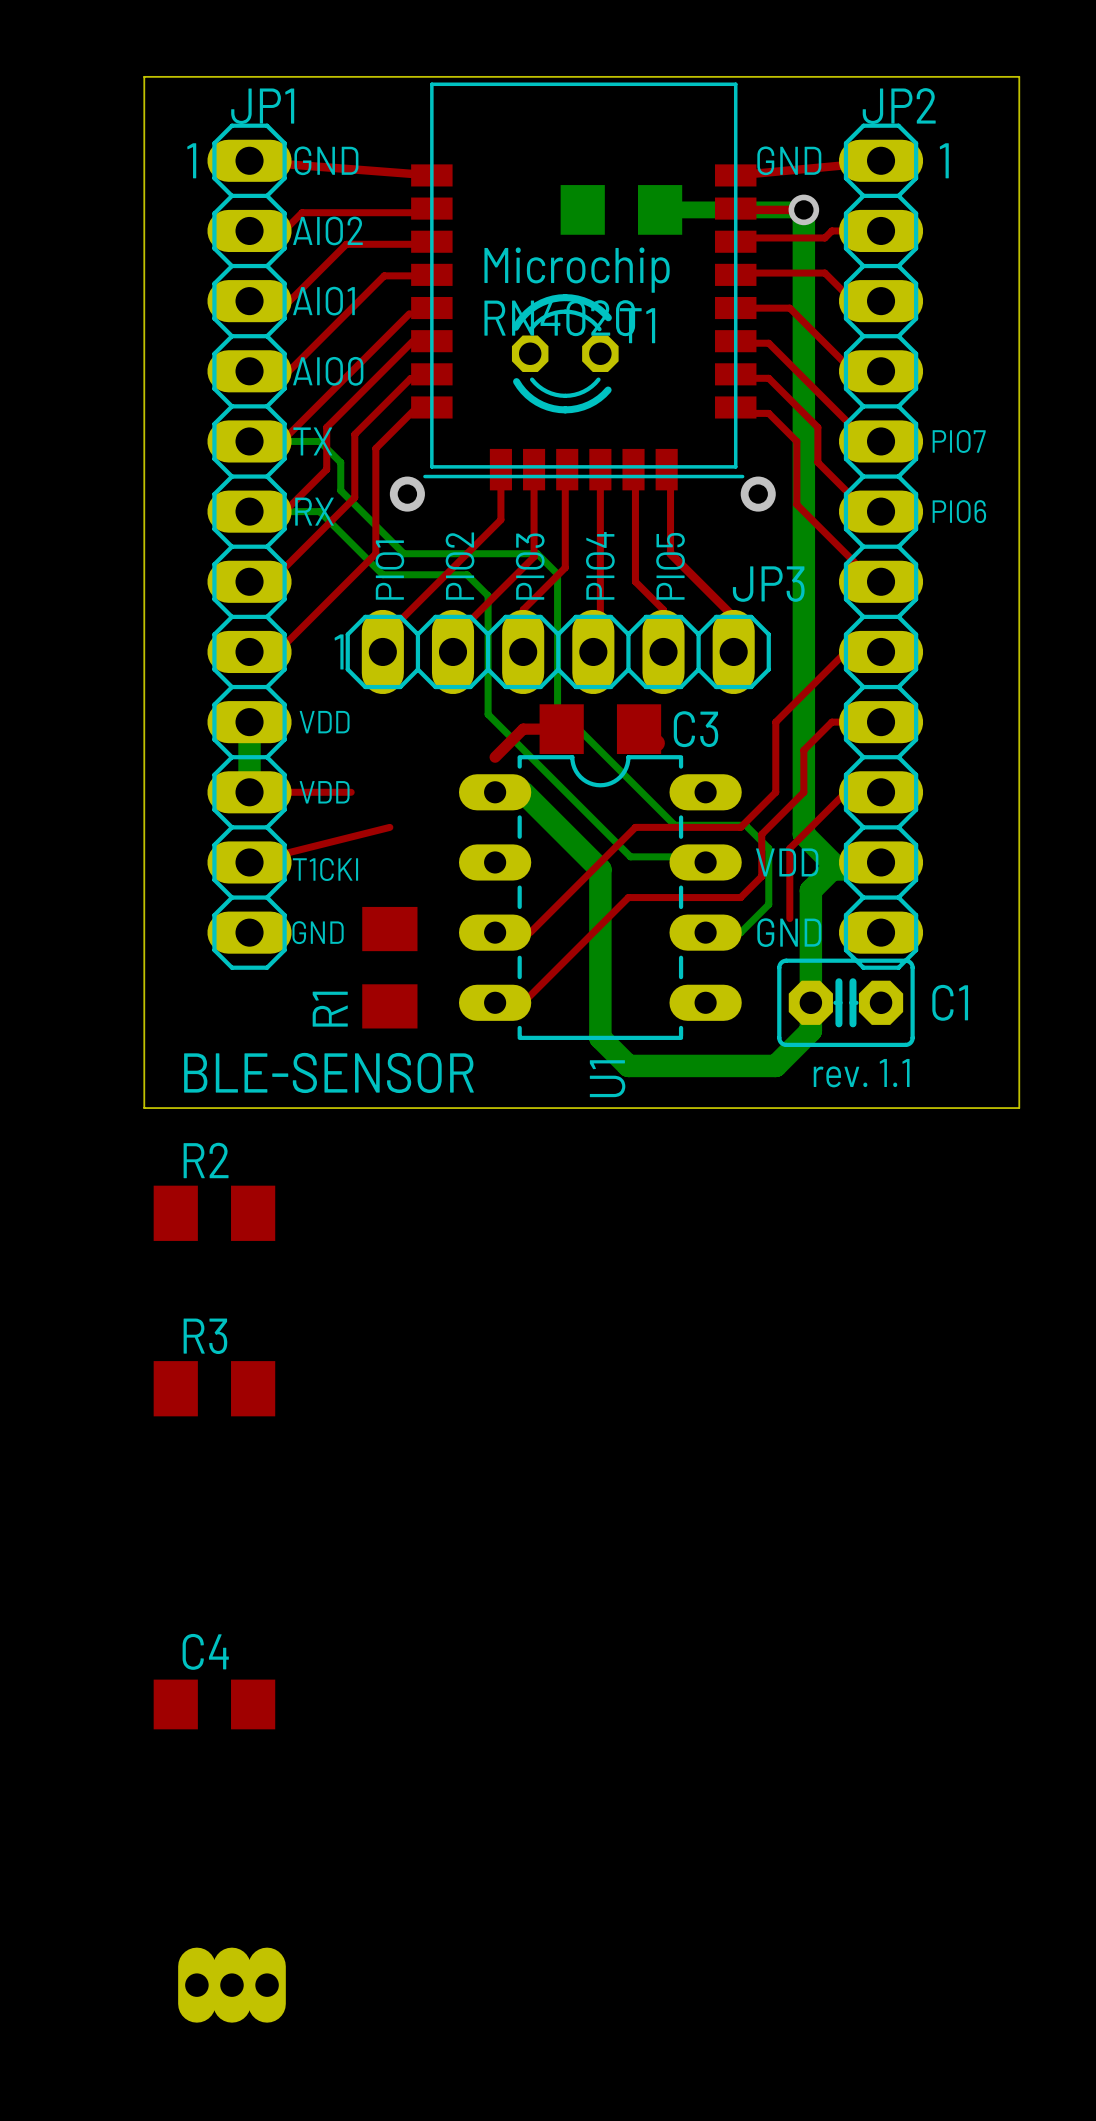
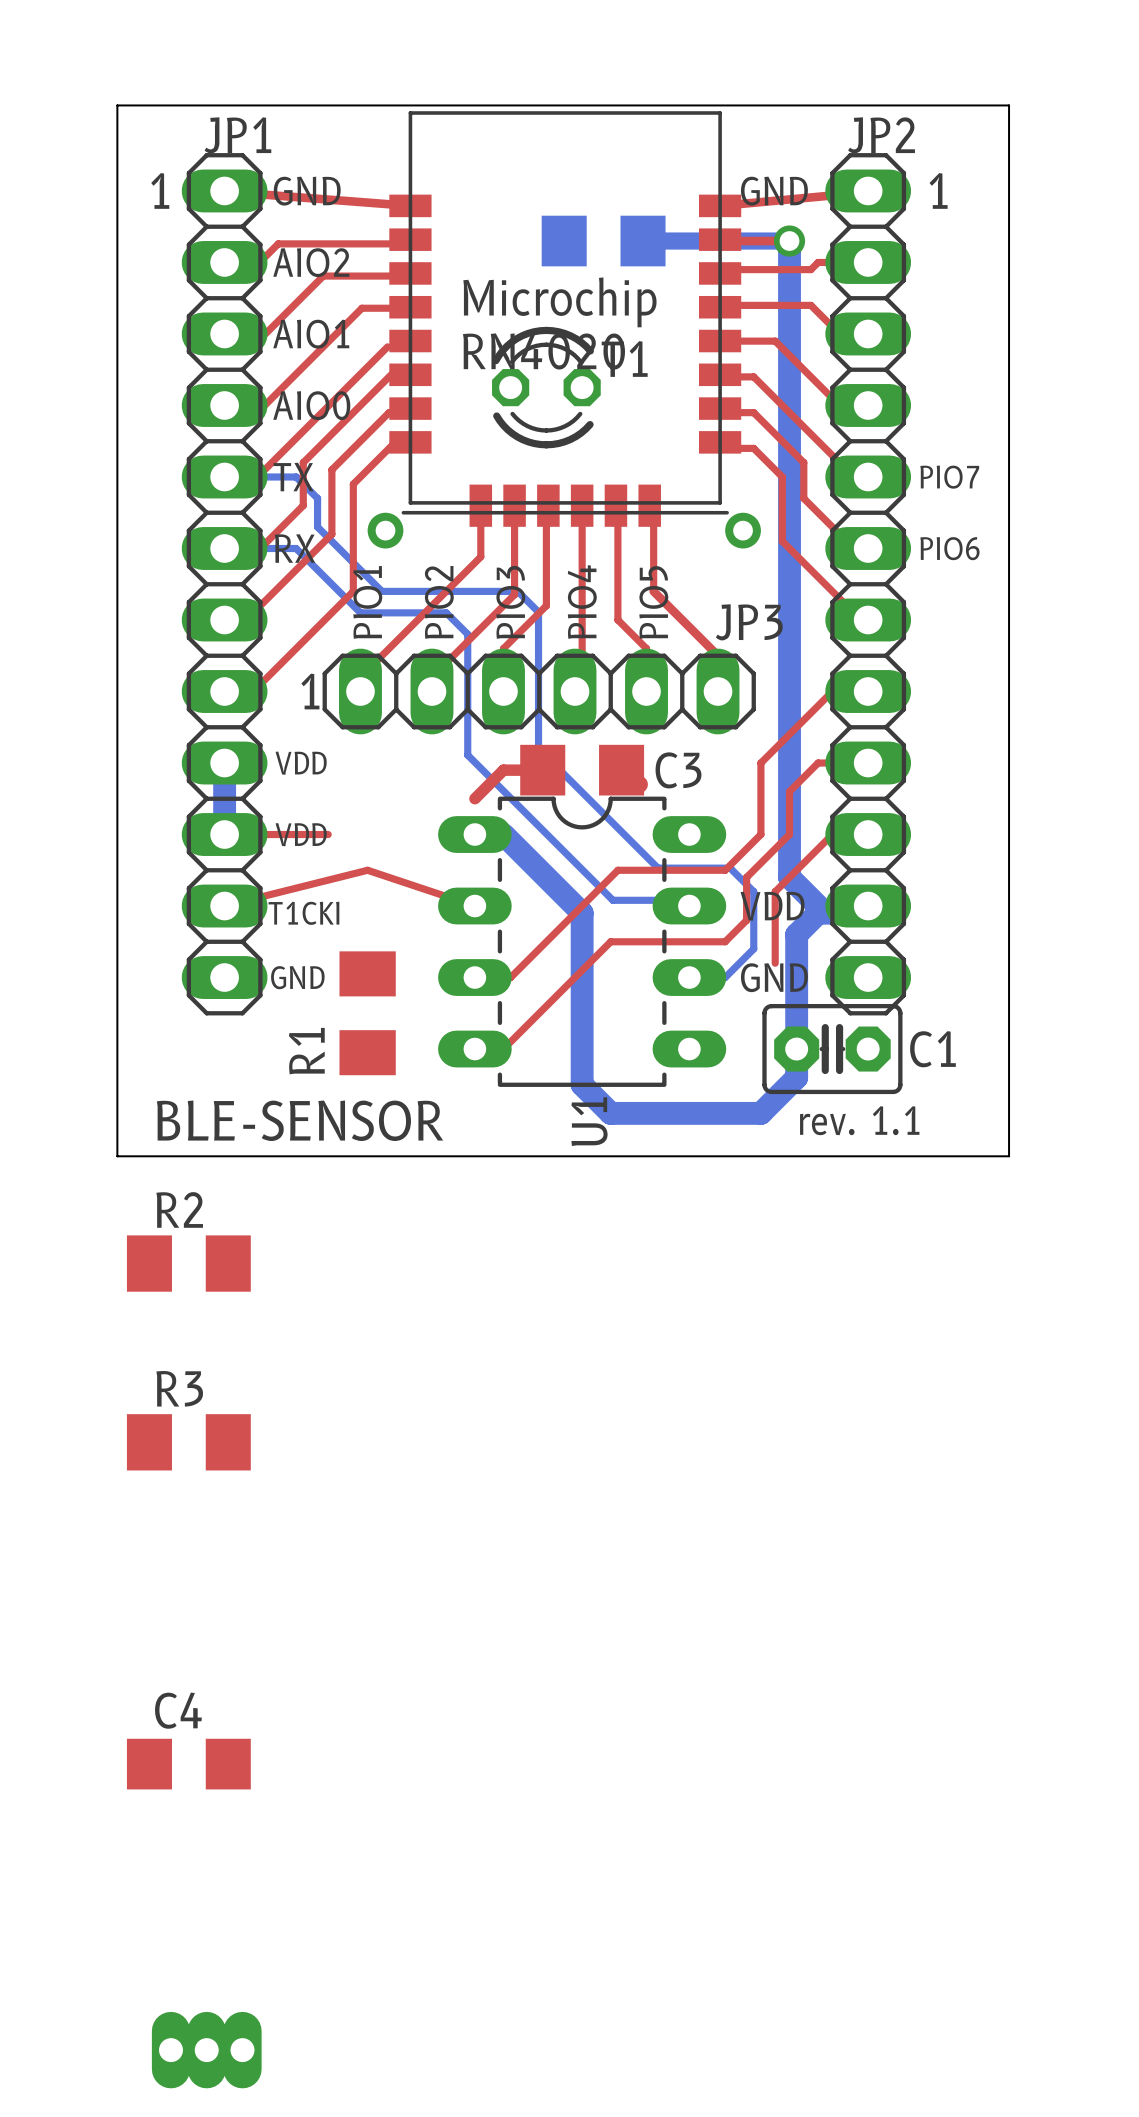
top track: none -> (367, 870) (474, 906)

